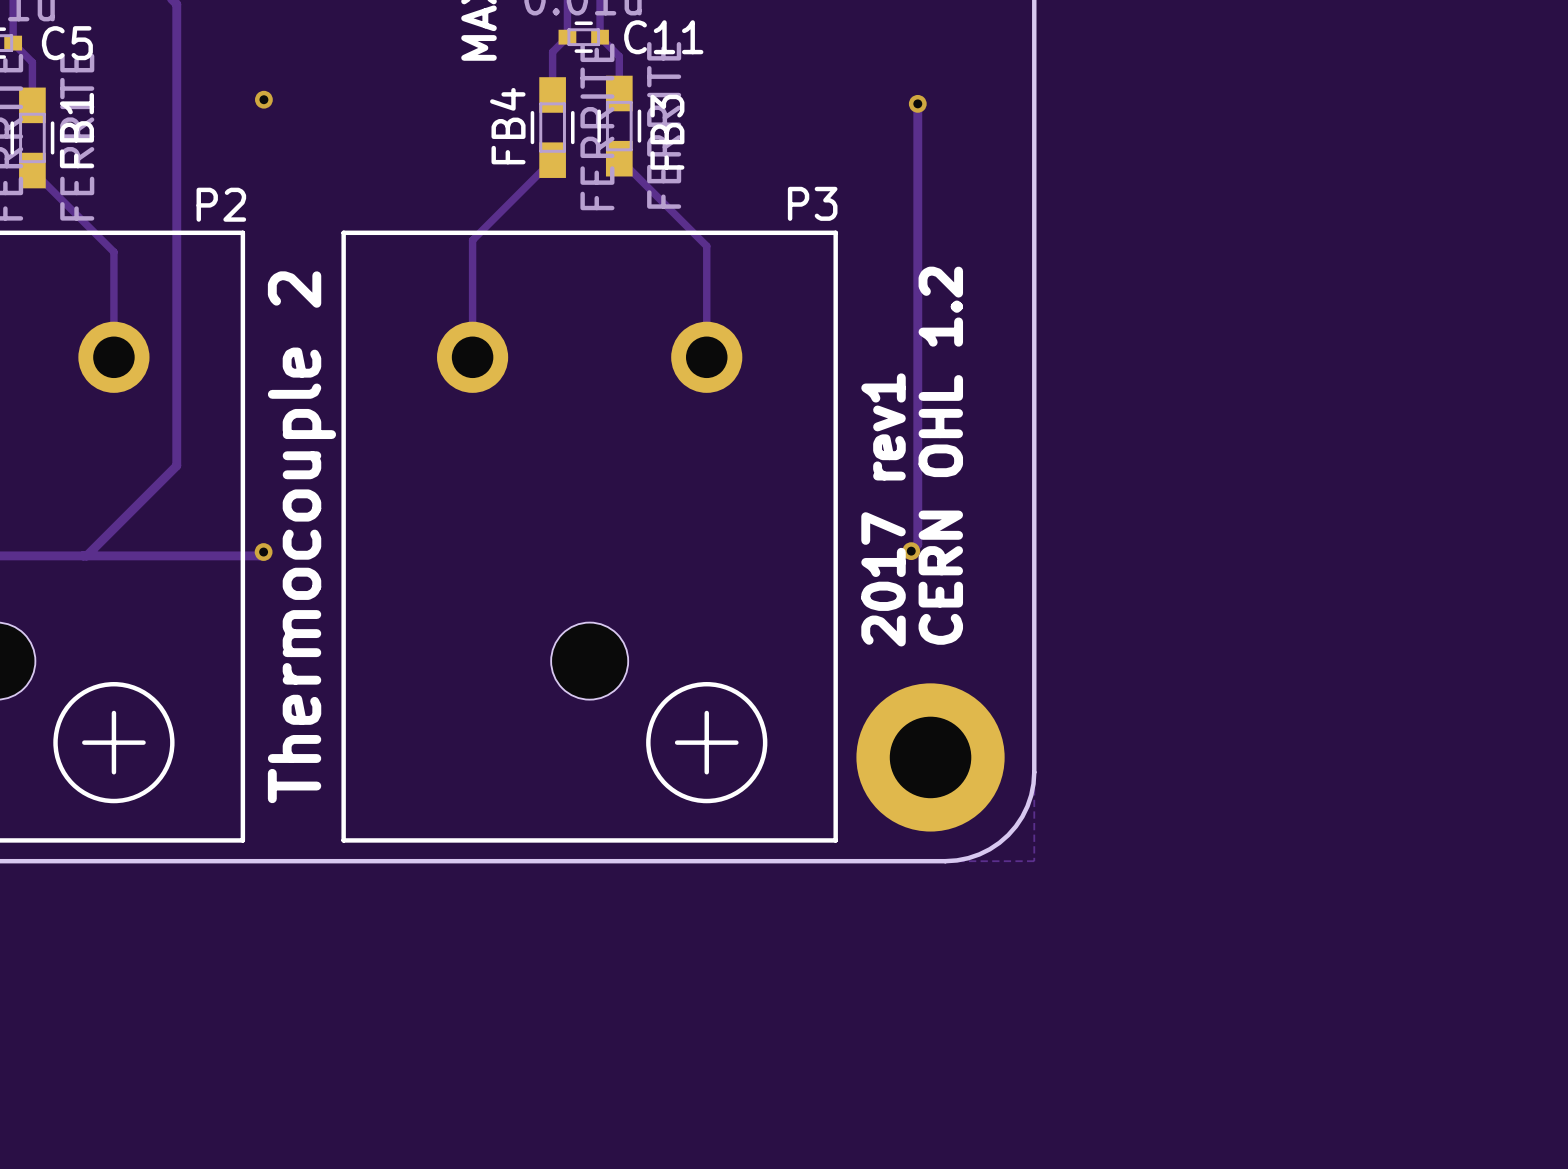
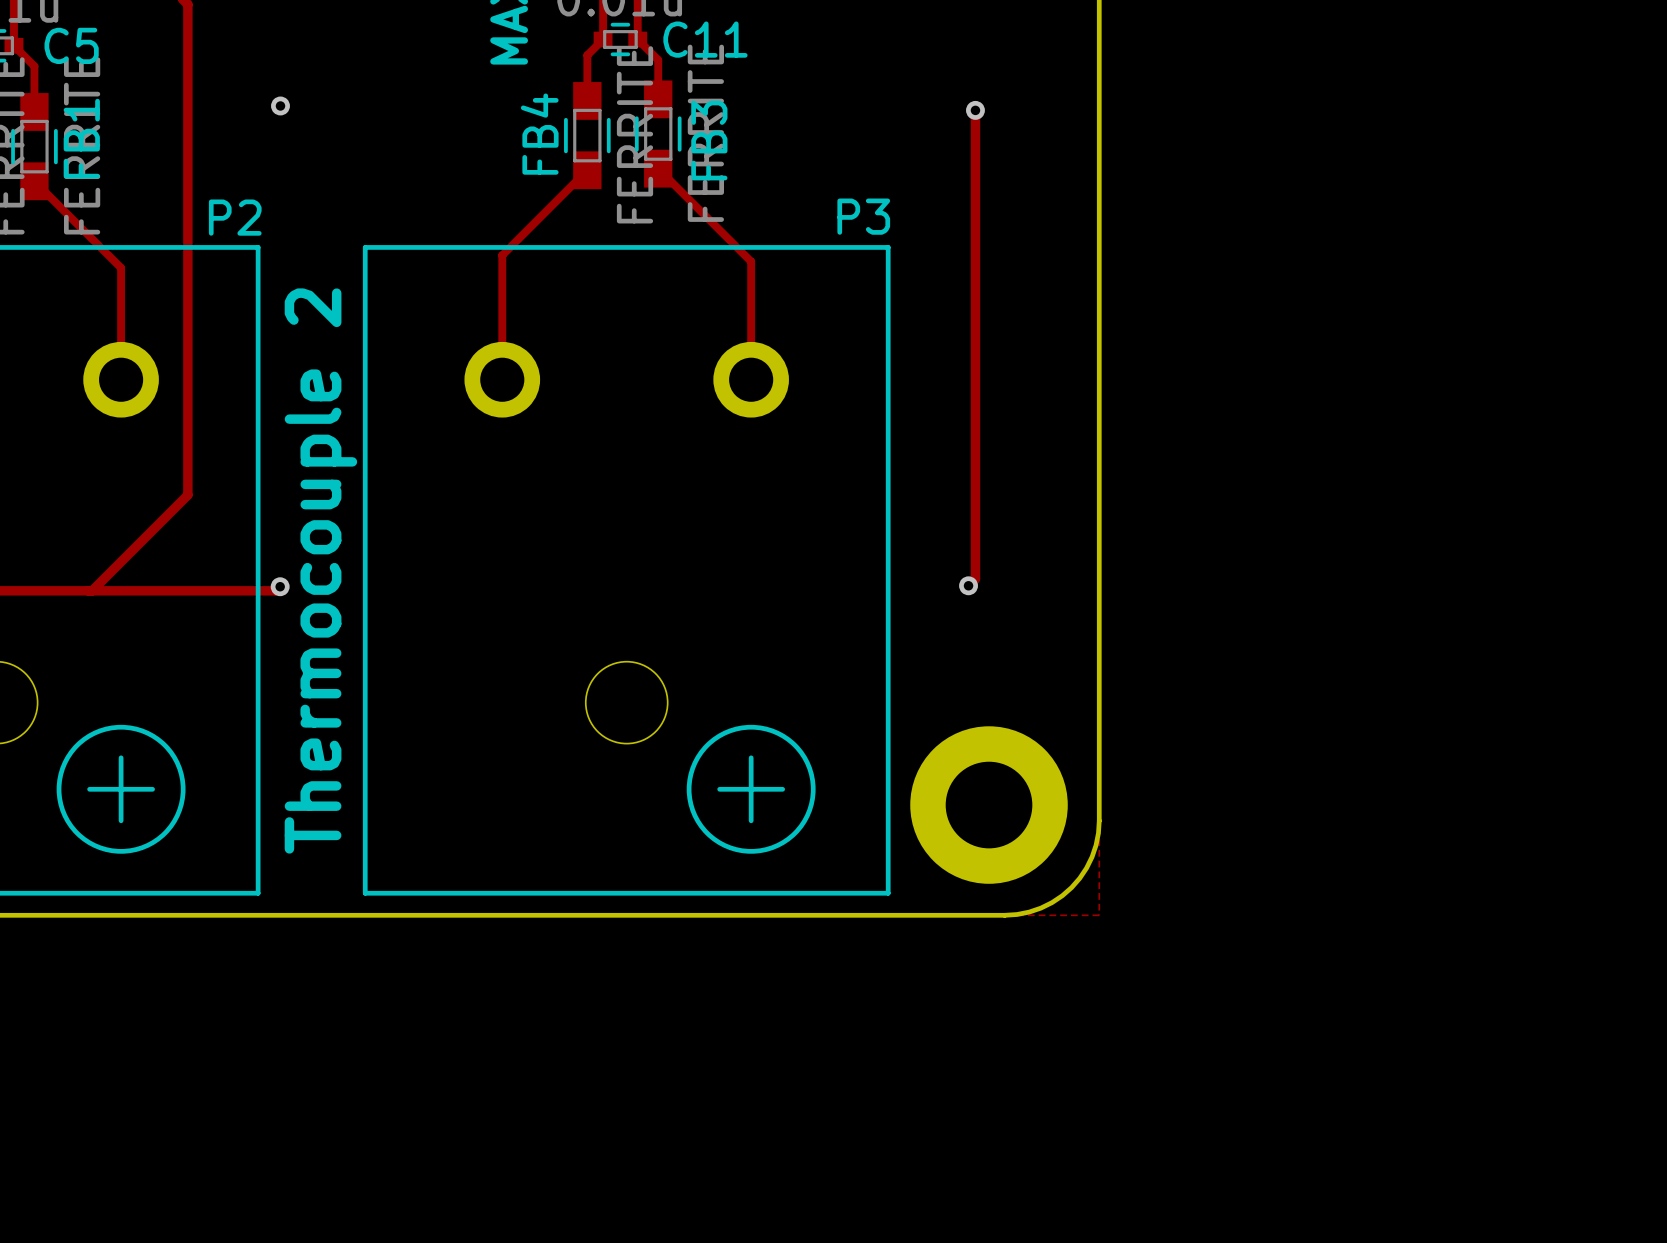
text: CERN OHL 1.2 (940, 455) -> none
text: 2017 rev1 (883, 509) -> none

